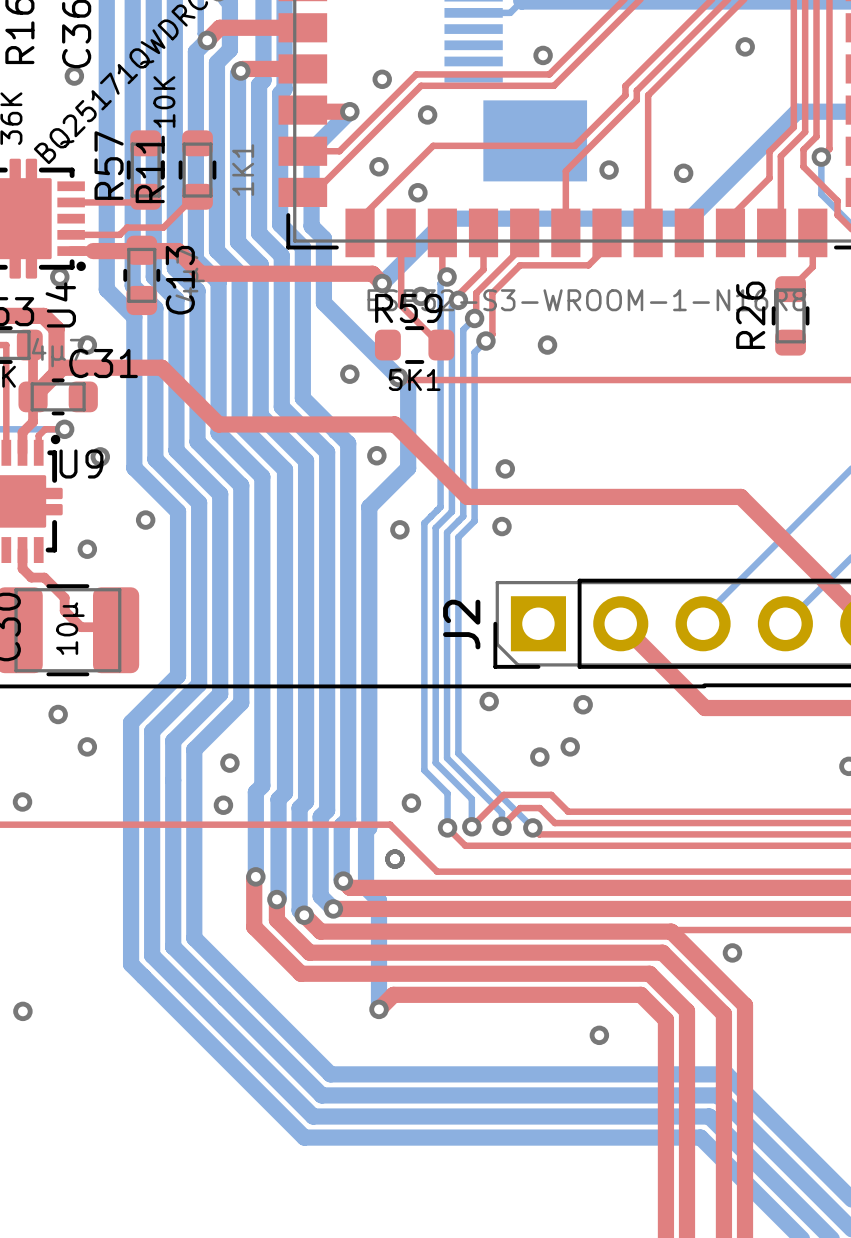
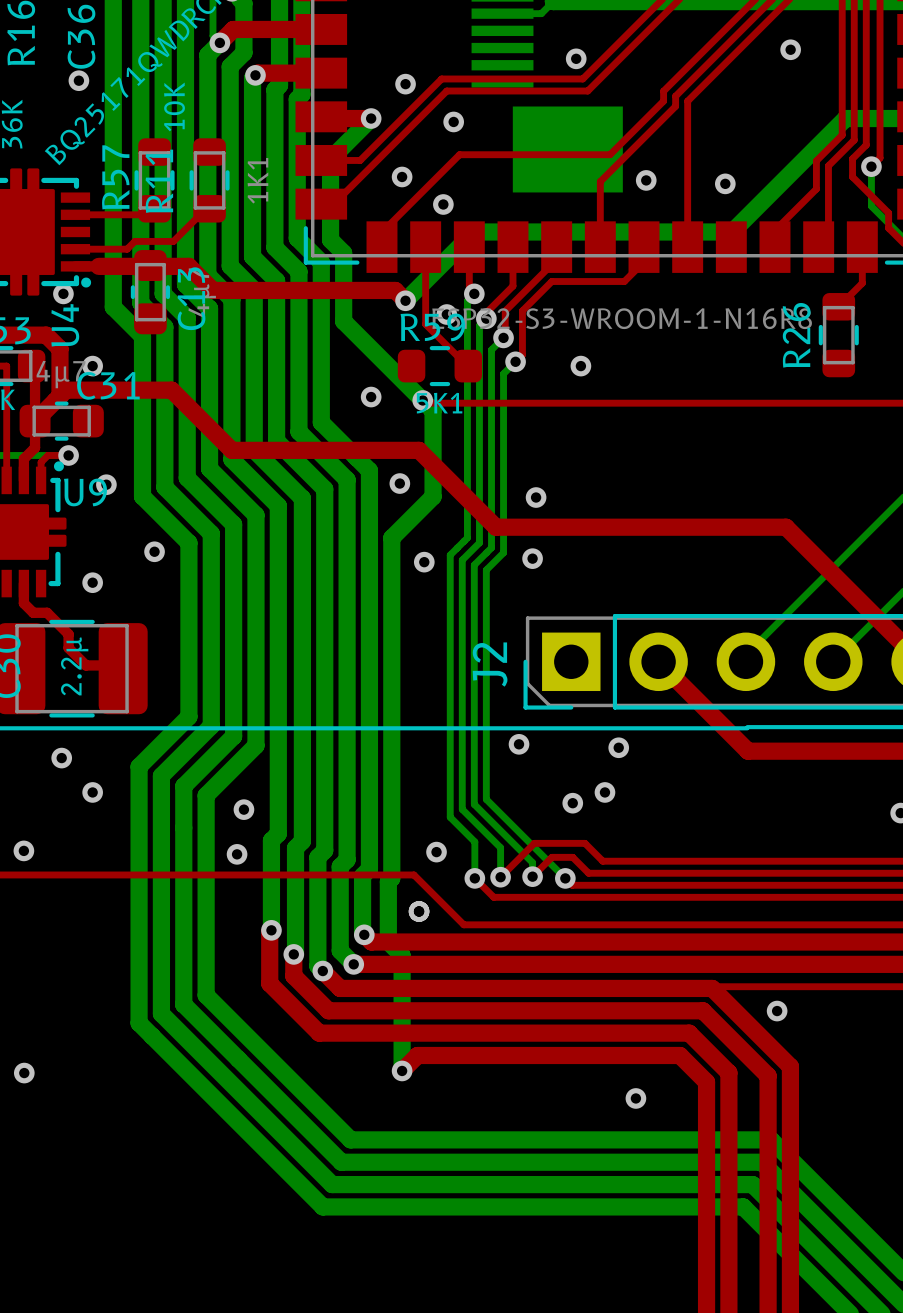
part value: 10µ (70, 628) -> 2.2µ (74, 666)

